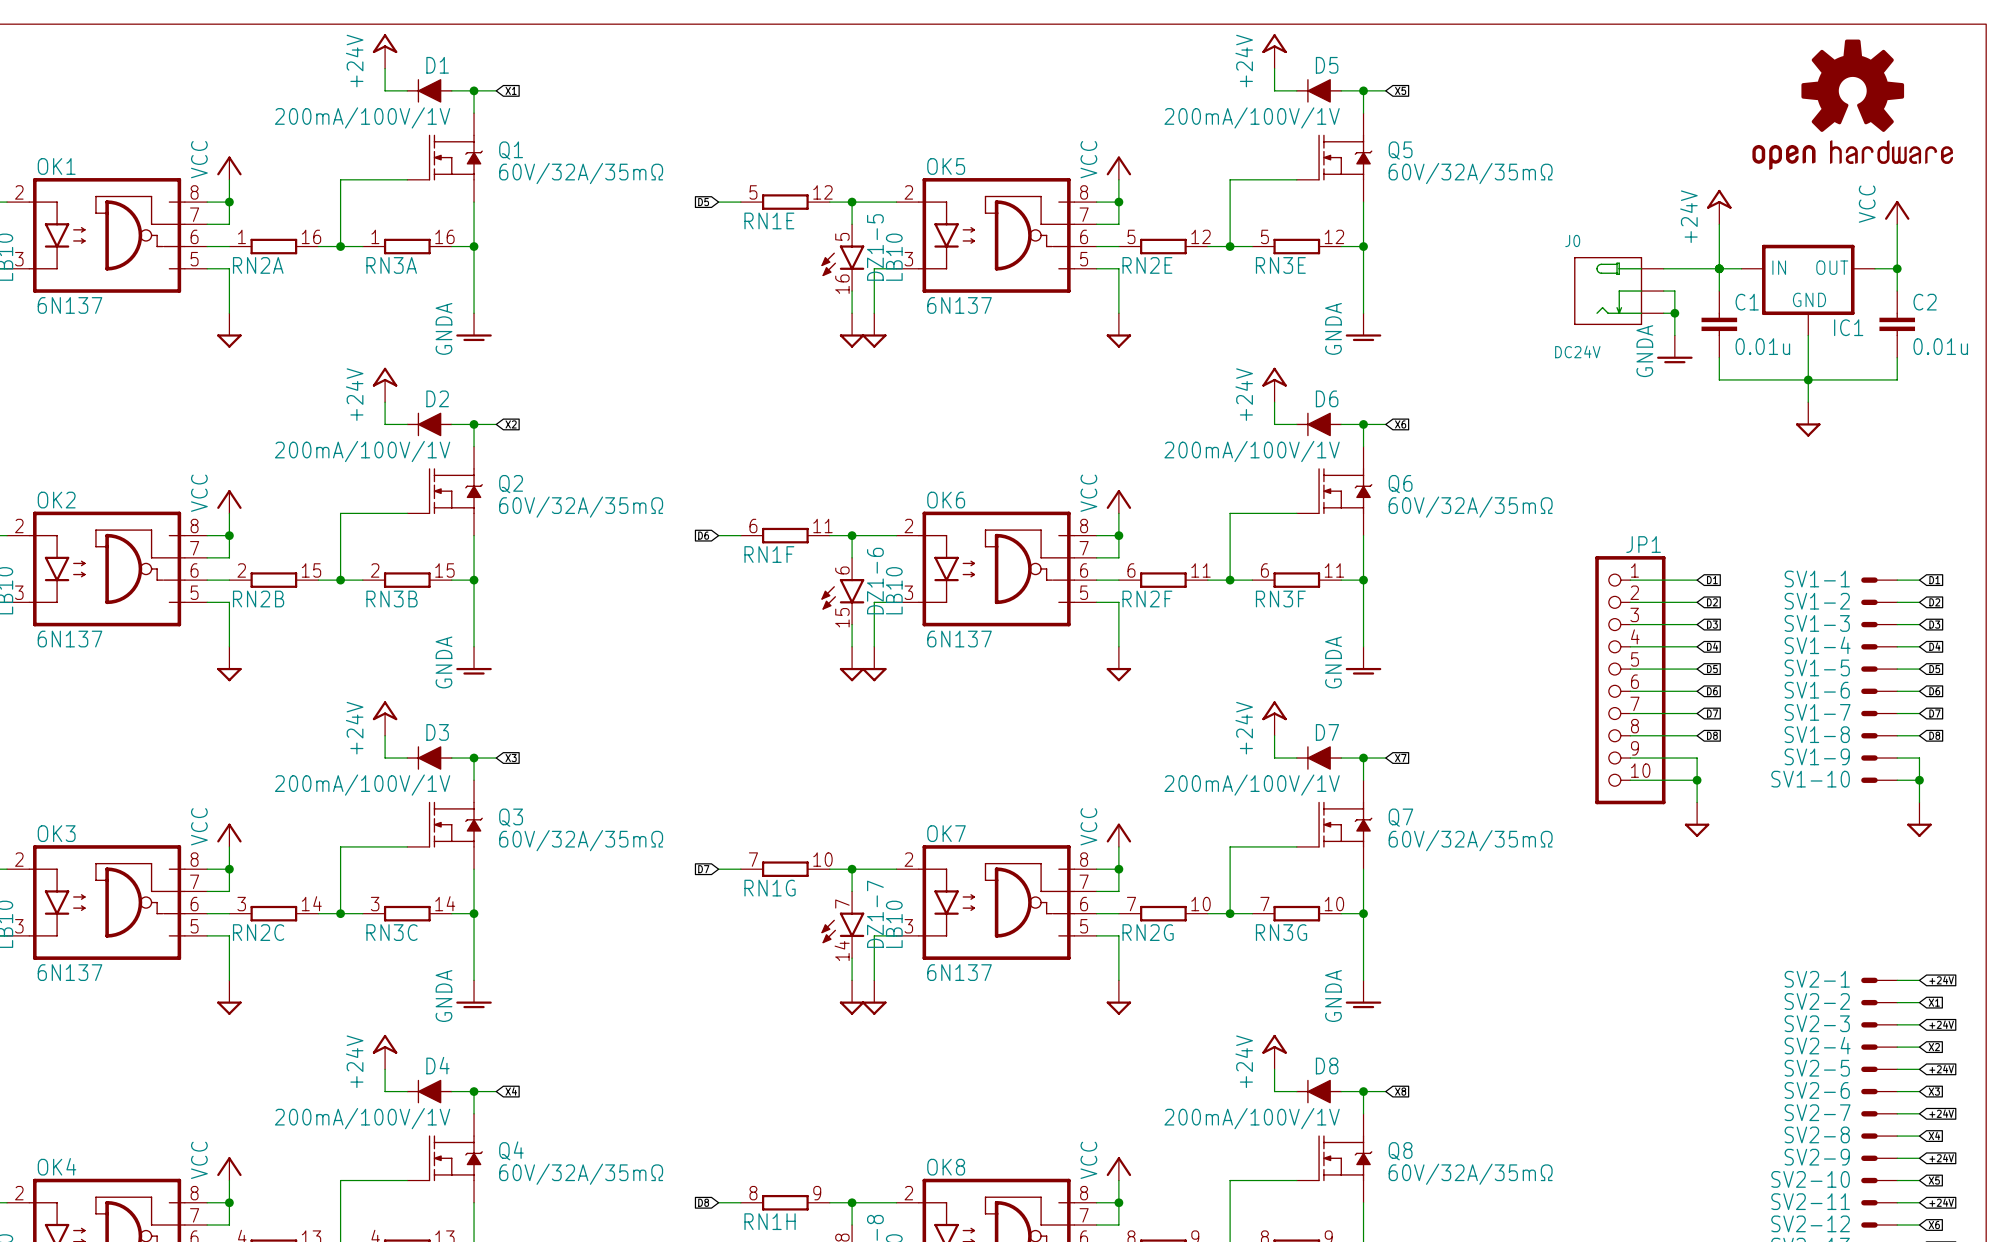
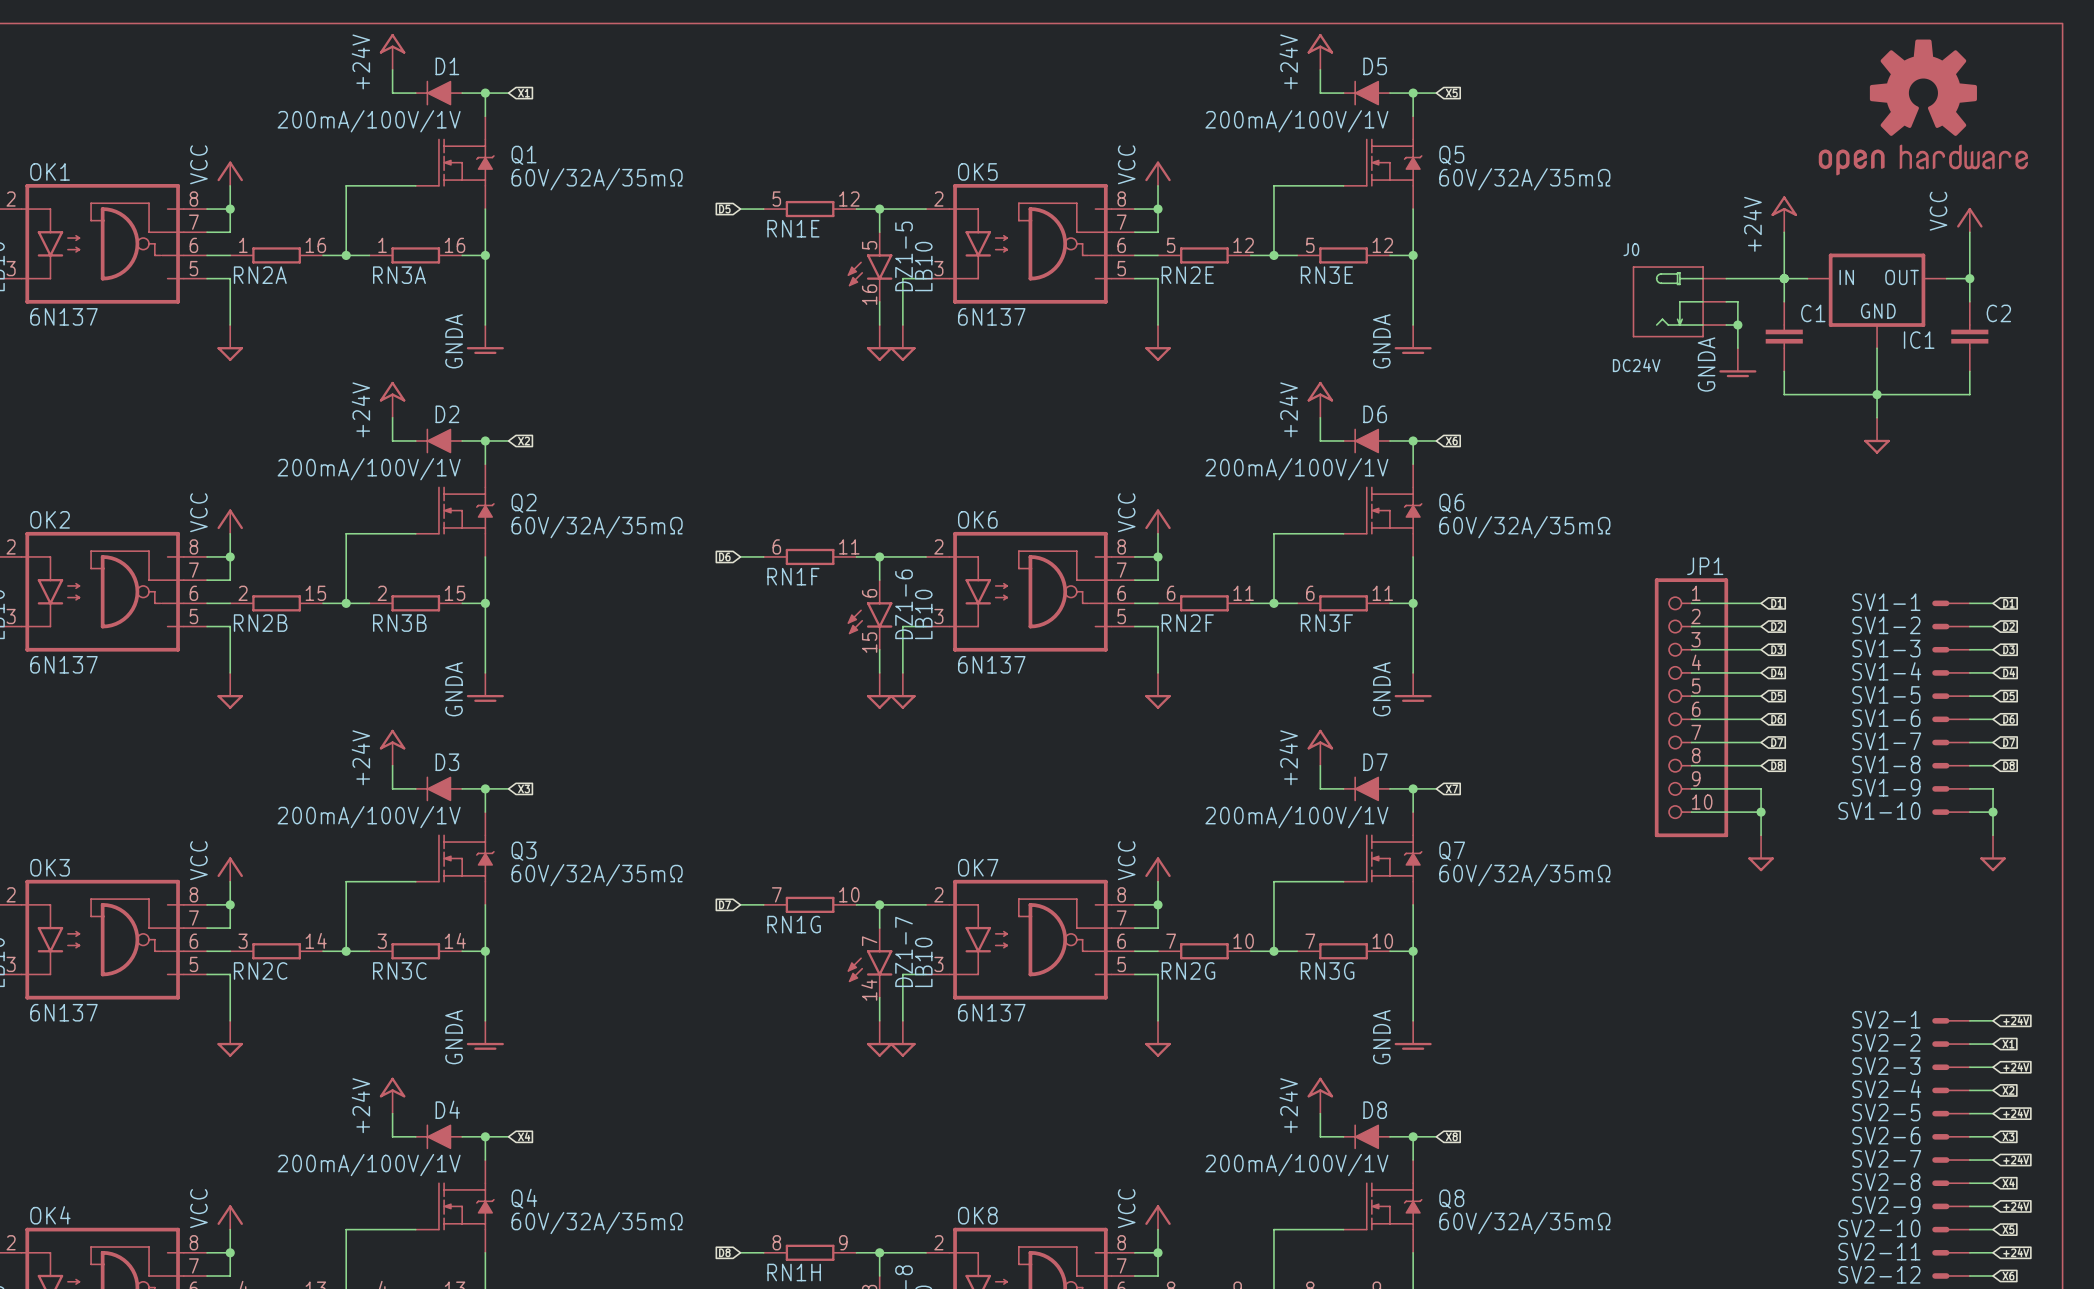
C1 value: 0.01u (1762, 346) -> none
C2 value: 0.01u (1940, 346) -> none

